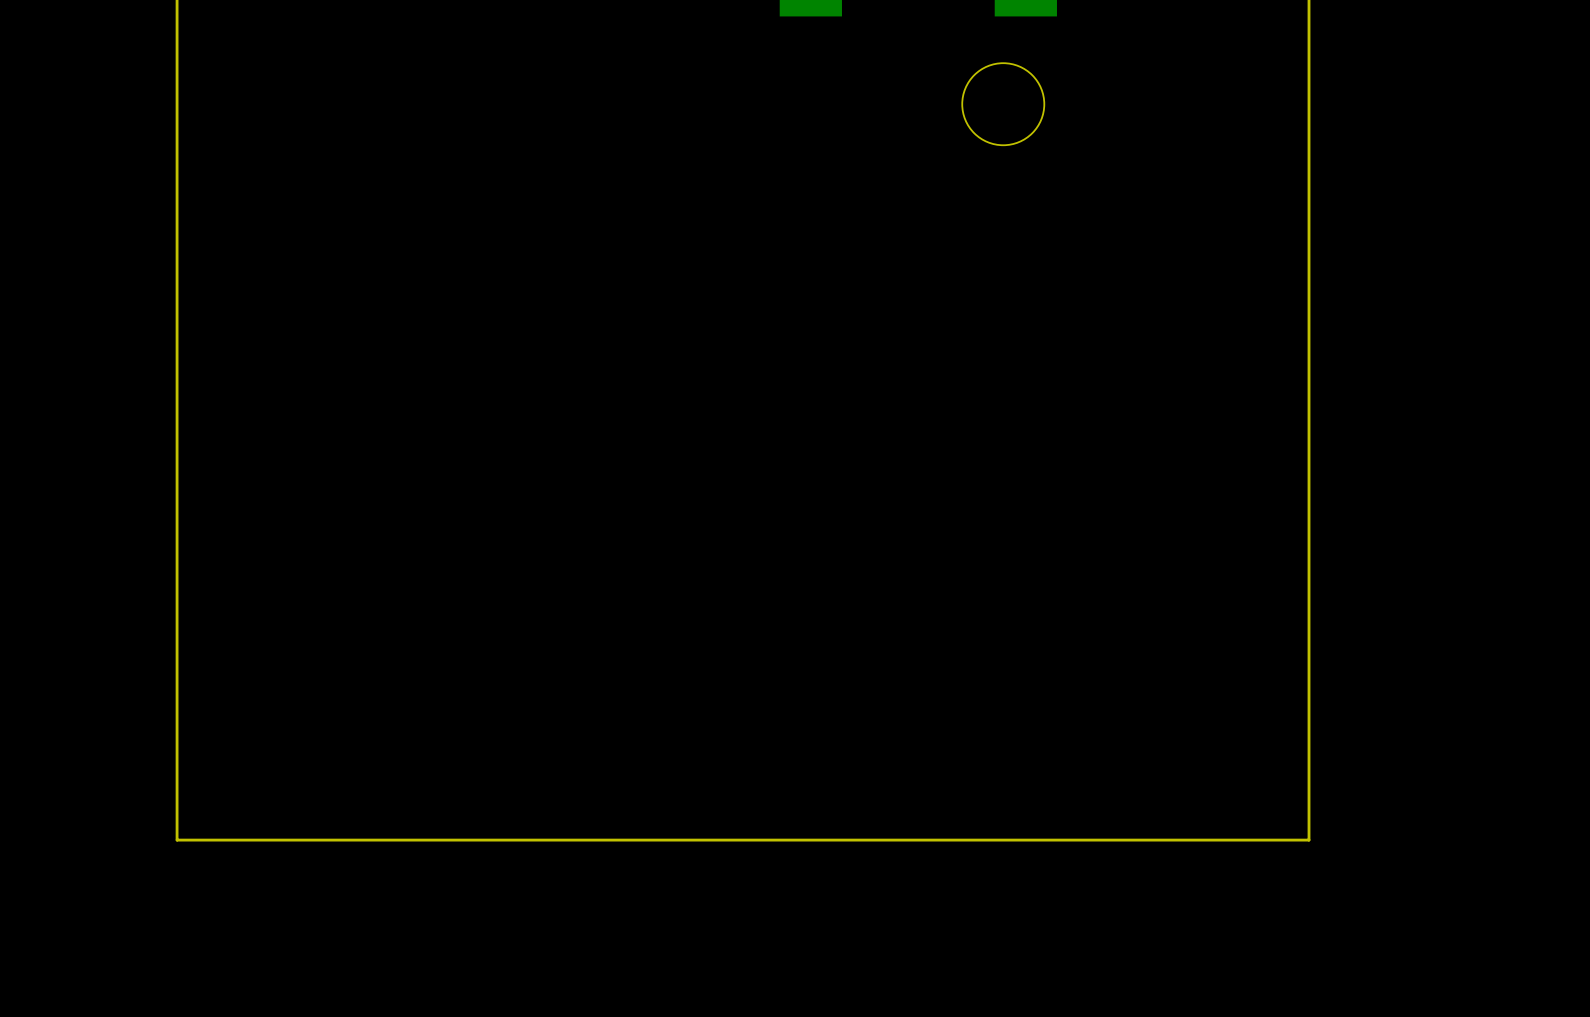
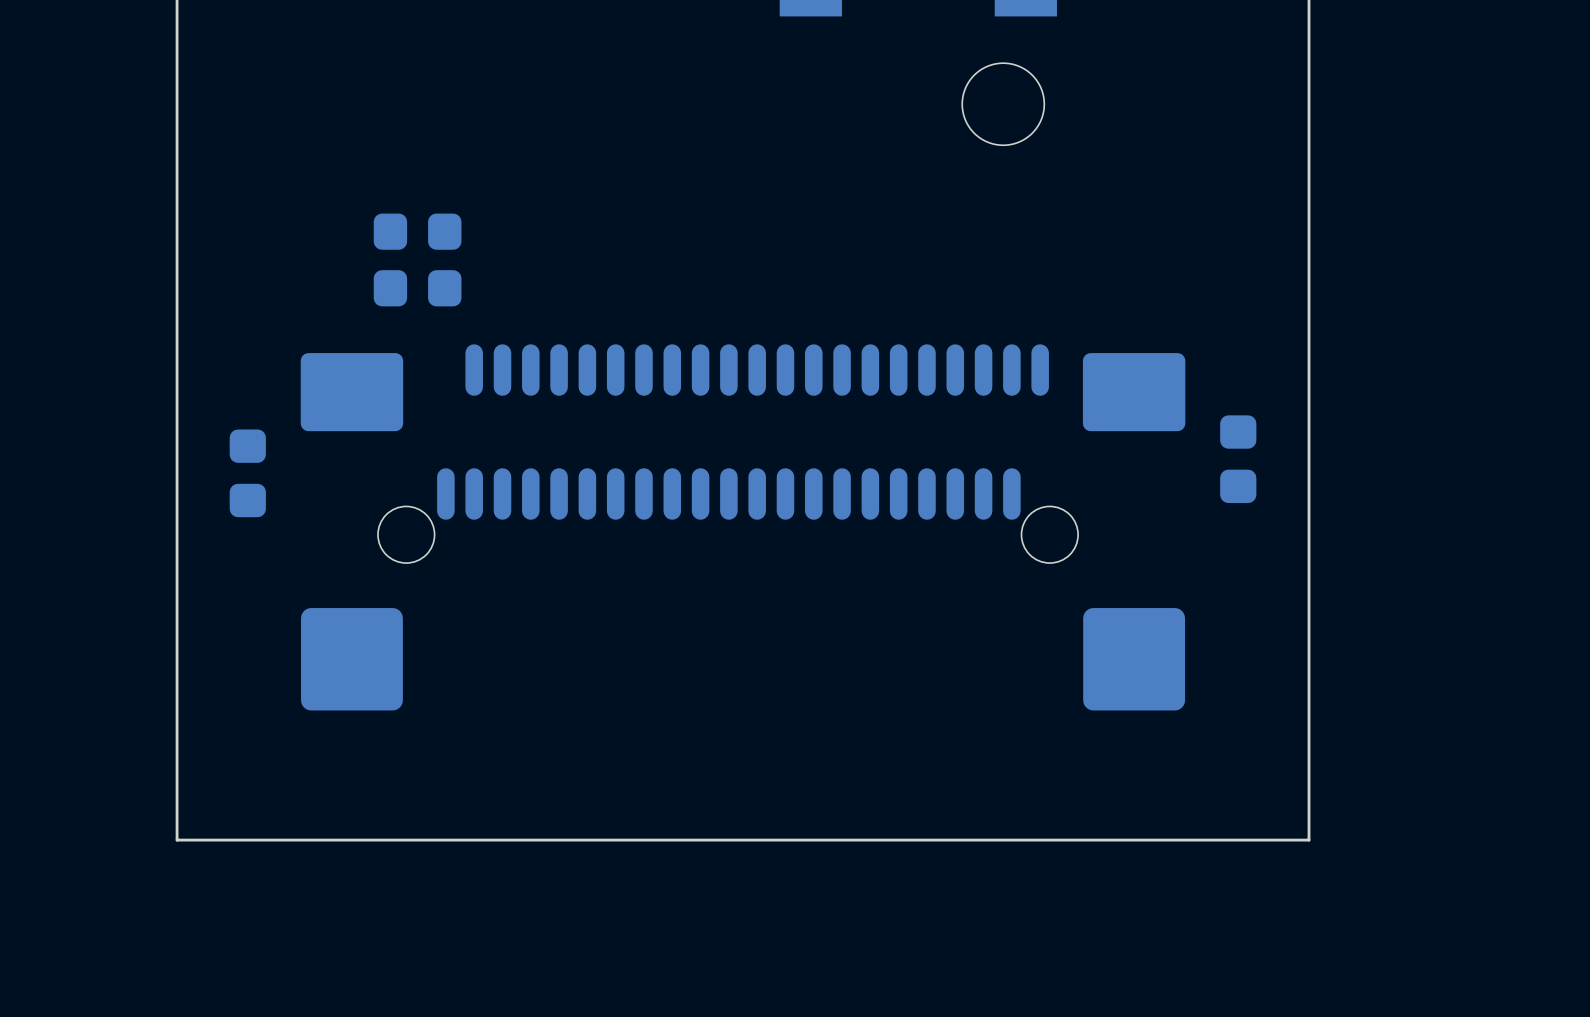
part: none -> (417, 231)
part: none -> (417, 288)
part: none -> (1238, 459)
part: none -> (247, 473)
part: none -> (743, 527)

